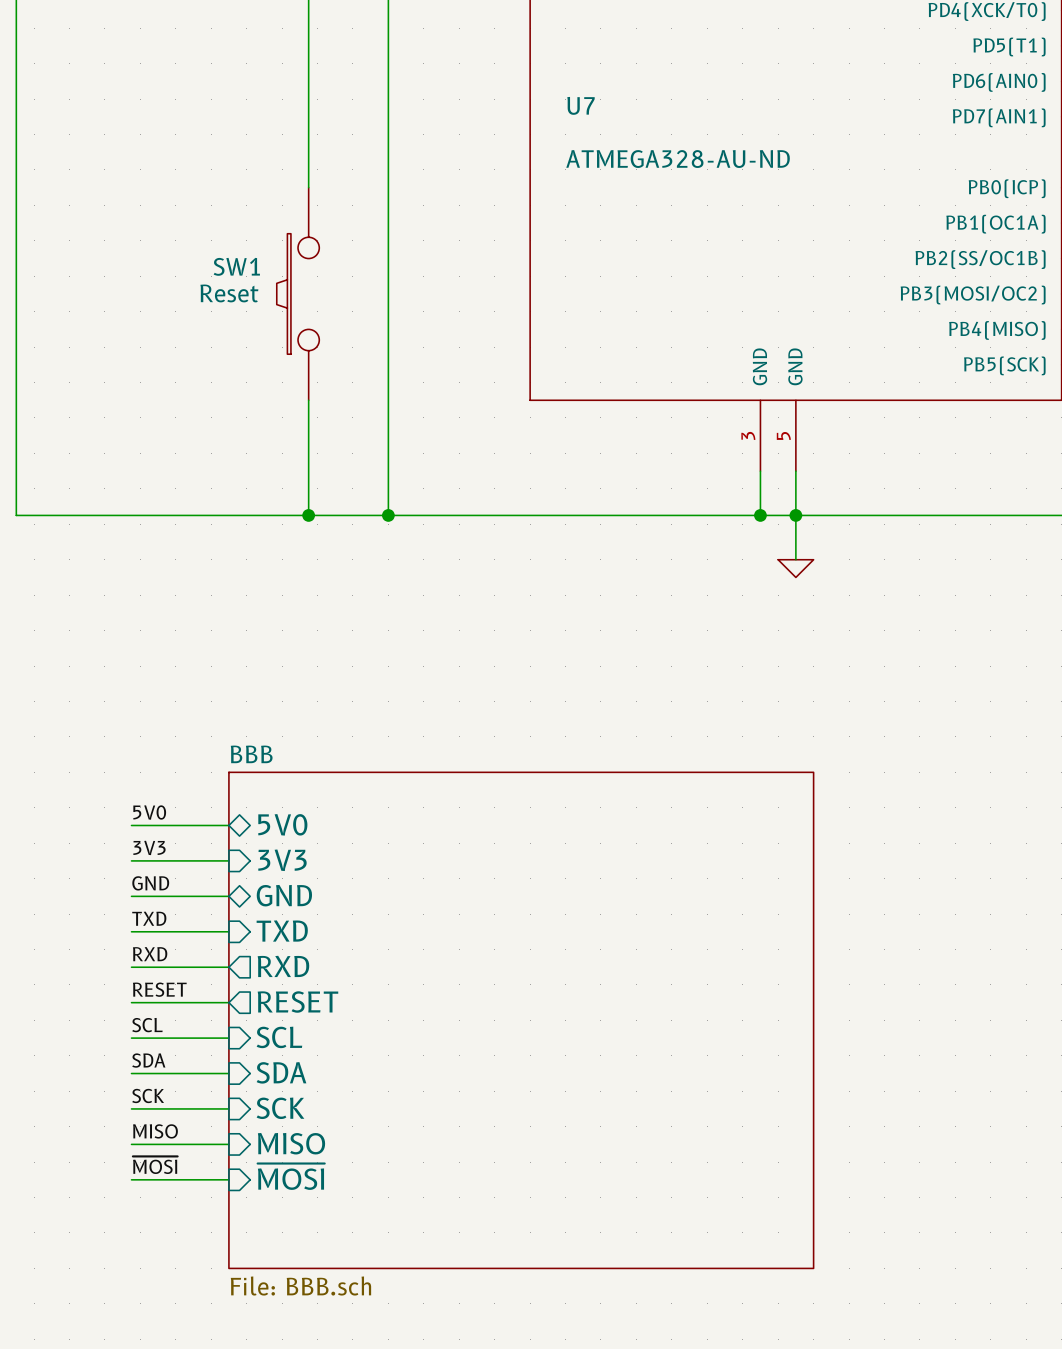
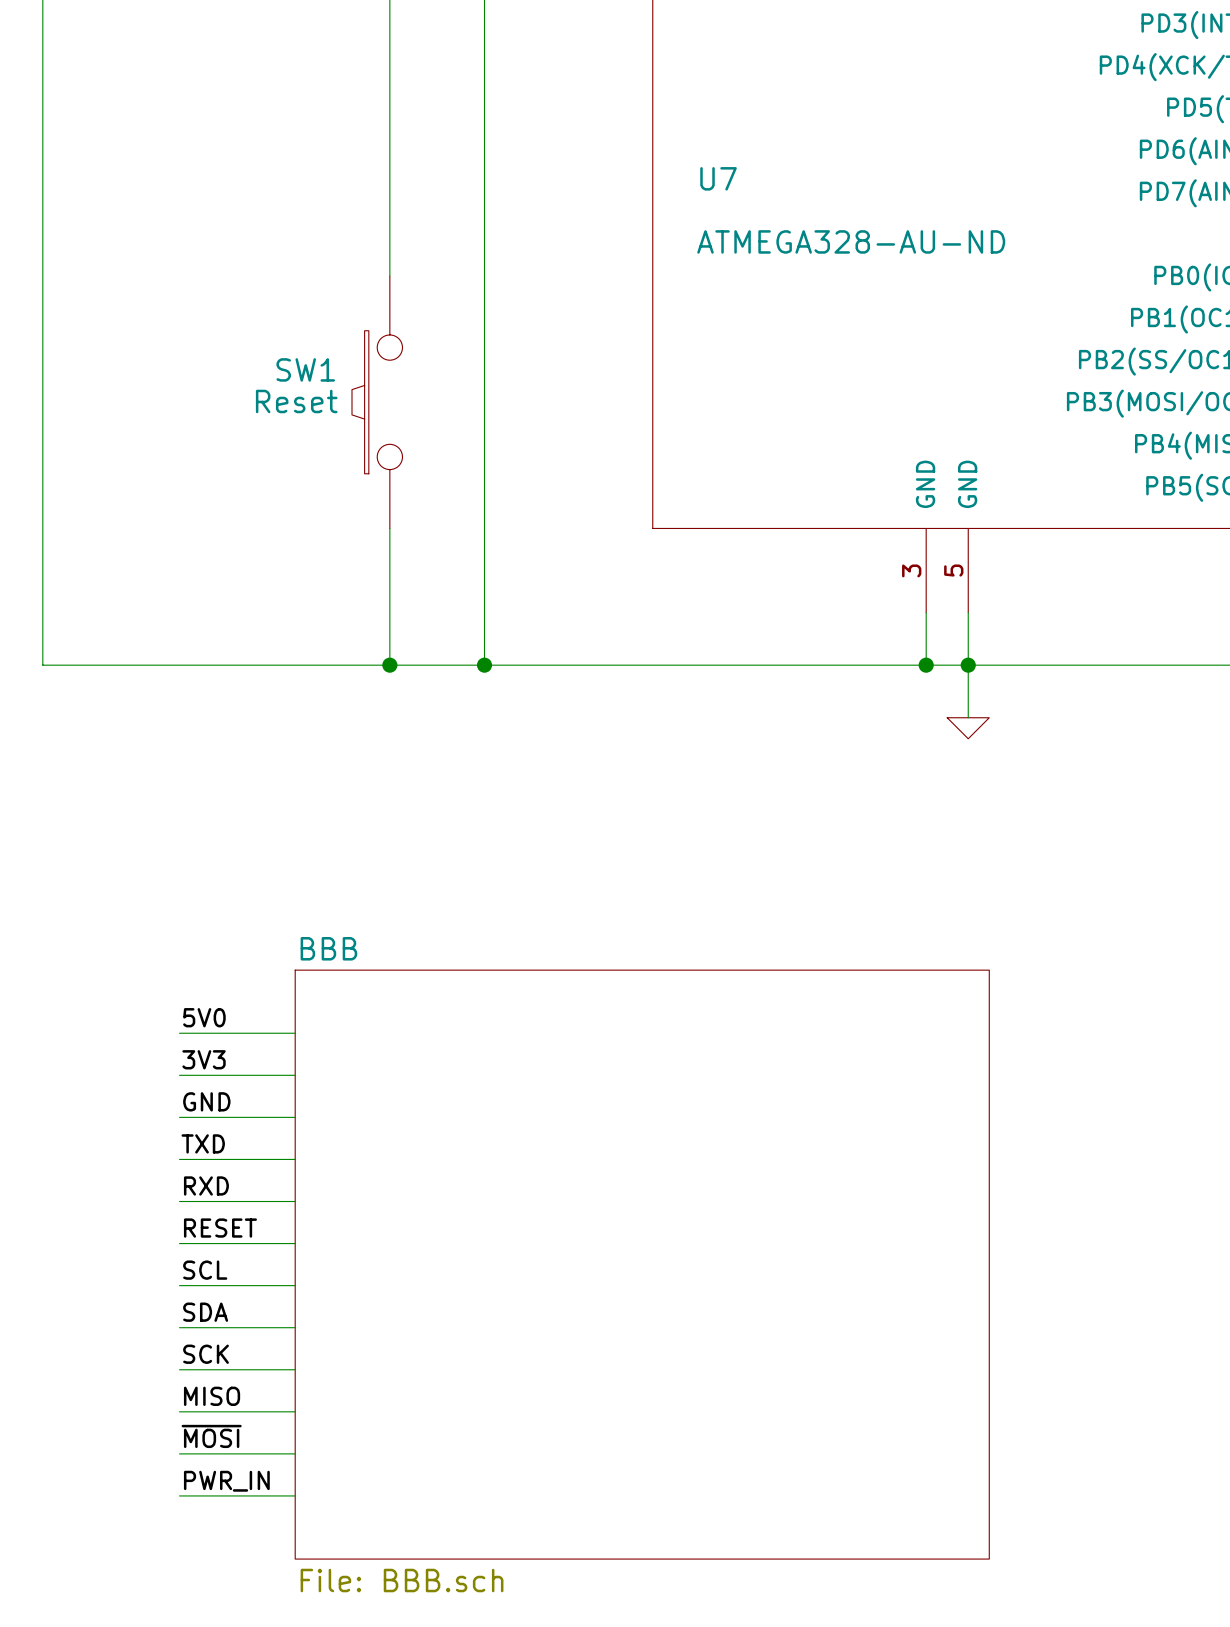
sheet pin: 5V0 (282, 824) -> none
sheet pin: 3V3 (282, 860) -> none
sheet pin: GND (284, 895) -> none
sheet pin: TXD (282, 931) -> none
sheet pin: RXD (283, 966) -> none
sheet pin: RESET (297, 1002) -> none
sheet pin: SCL (279, 1037) -> none
sheet pin: SDA (281, 1072) -> none
sheet pin: SCK (280, 1108) -> none
sheet pin: MISO (291, 1143) -> none
sheet pin: ~{MOSI} (291, 1176) -> none
label: none -> PWR_IN (226, 1481)
wire: none -> (179, 1495) (295, 1495)

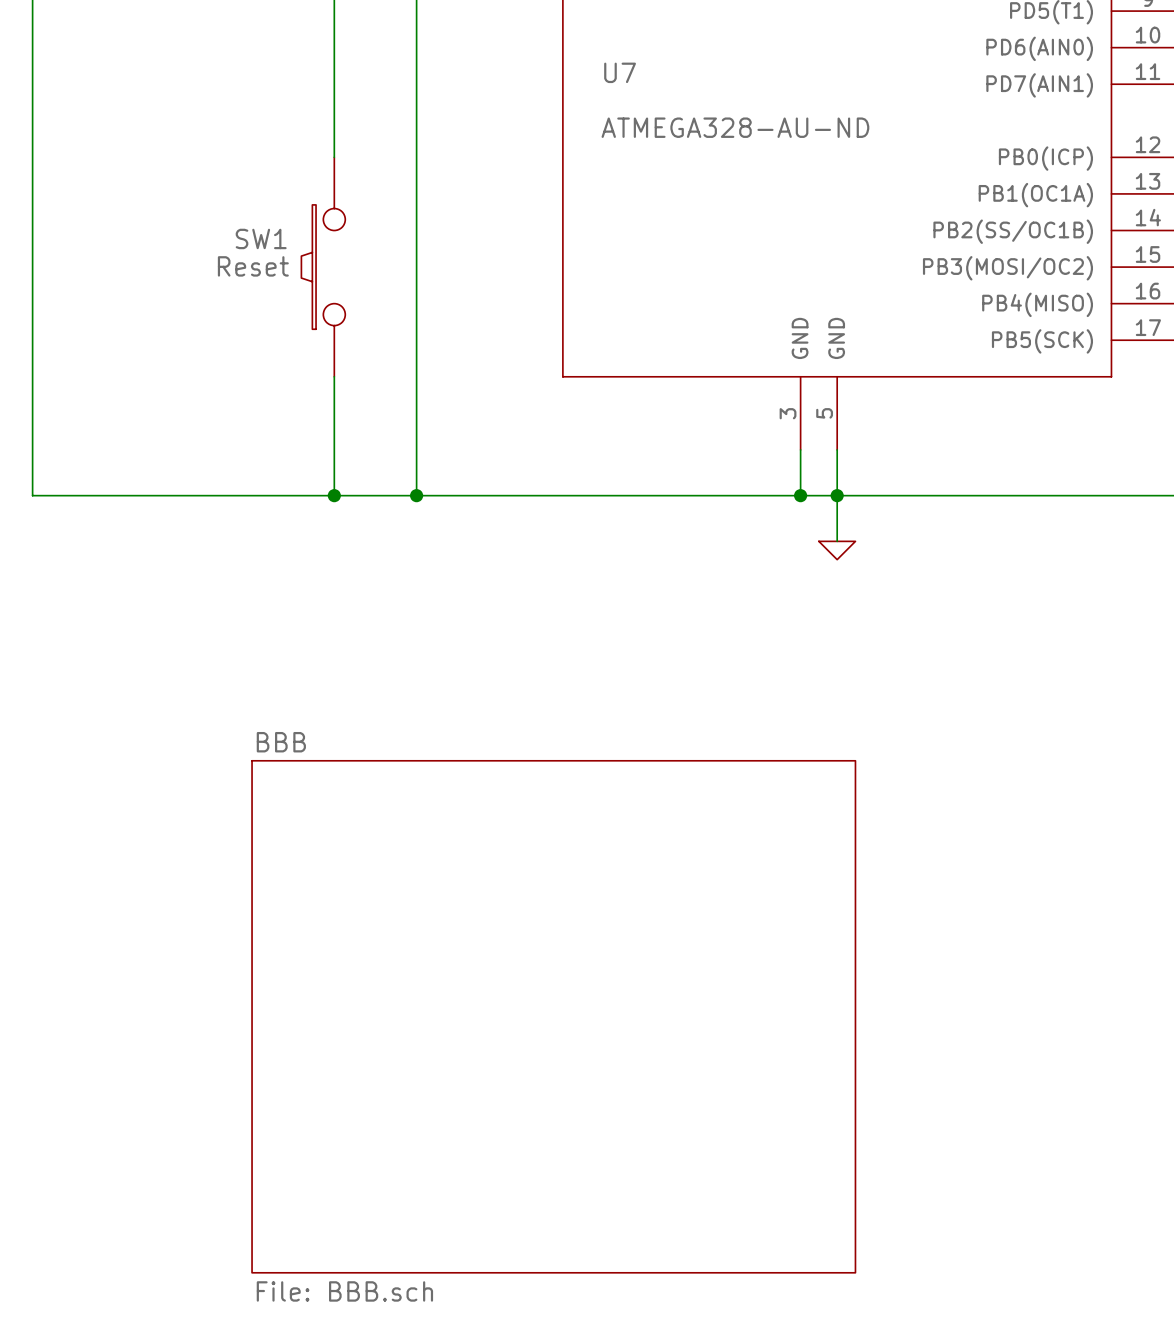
label: 5V0 (204, 1017) -> none
wire: (179, 1033) (295, 1033) -> none
label: 3V3 (204, 1059) -> none
wire: (179, 1075) (295, 1075) -> none
label: GND (206, 1101) -> none
wire: (179, 1117) (295, 1117) -> none
label: TXD (203, 1143) -> none
wire: (179, 1159) (295, 1159) -> none
label: RXD (206, 1185) -> none
wire: (179, 1201) (295, 1201) -> none
label: RESET (220, 1228) -> none
wire: (179, 1243) (295, 1243) -> none
label: SCL (205, 1270) -> none
wire: (179, 1285) (295, 1285) -> none
label: SDA (205, 1312) -> none
wire: (179, 1327) (295, 1327) -> none
label: SCK (206, 1354) -> none
wire: (179, 1369) (295, 1369) -> none
label: MISO (212, 1396) -> none
wire: (179, 1411) (295, 1411) -> none
label: ~{MOSI} (211, 1436) -> none
wire: (179, 1453) (295, 1453) -> none
label: PWR_IN (226, 1481) -> none
wire: (179, 1495) (295, 1495) -> none

